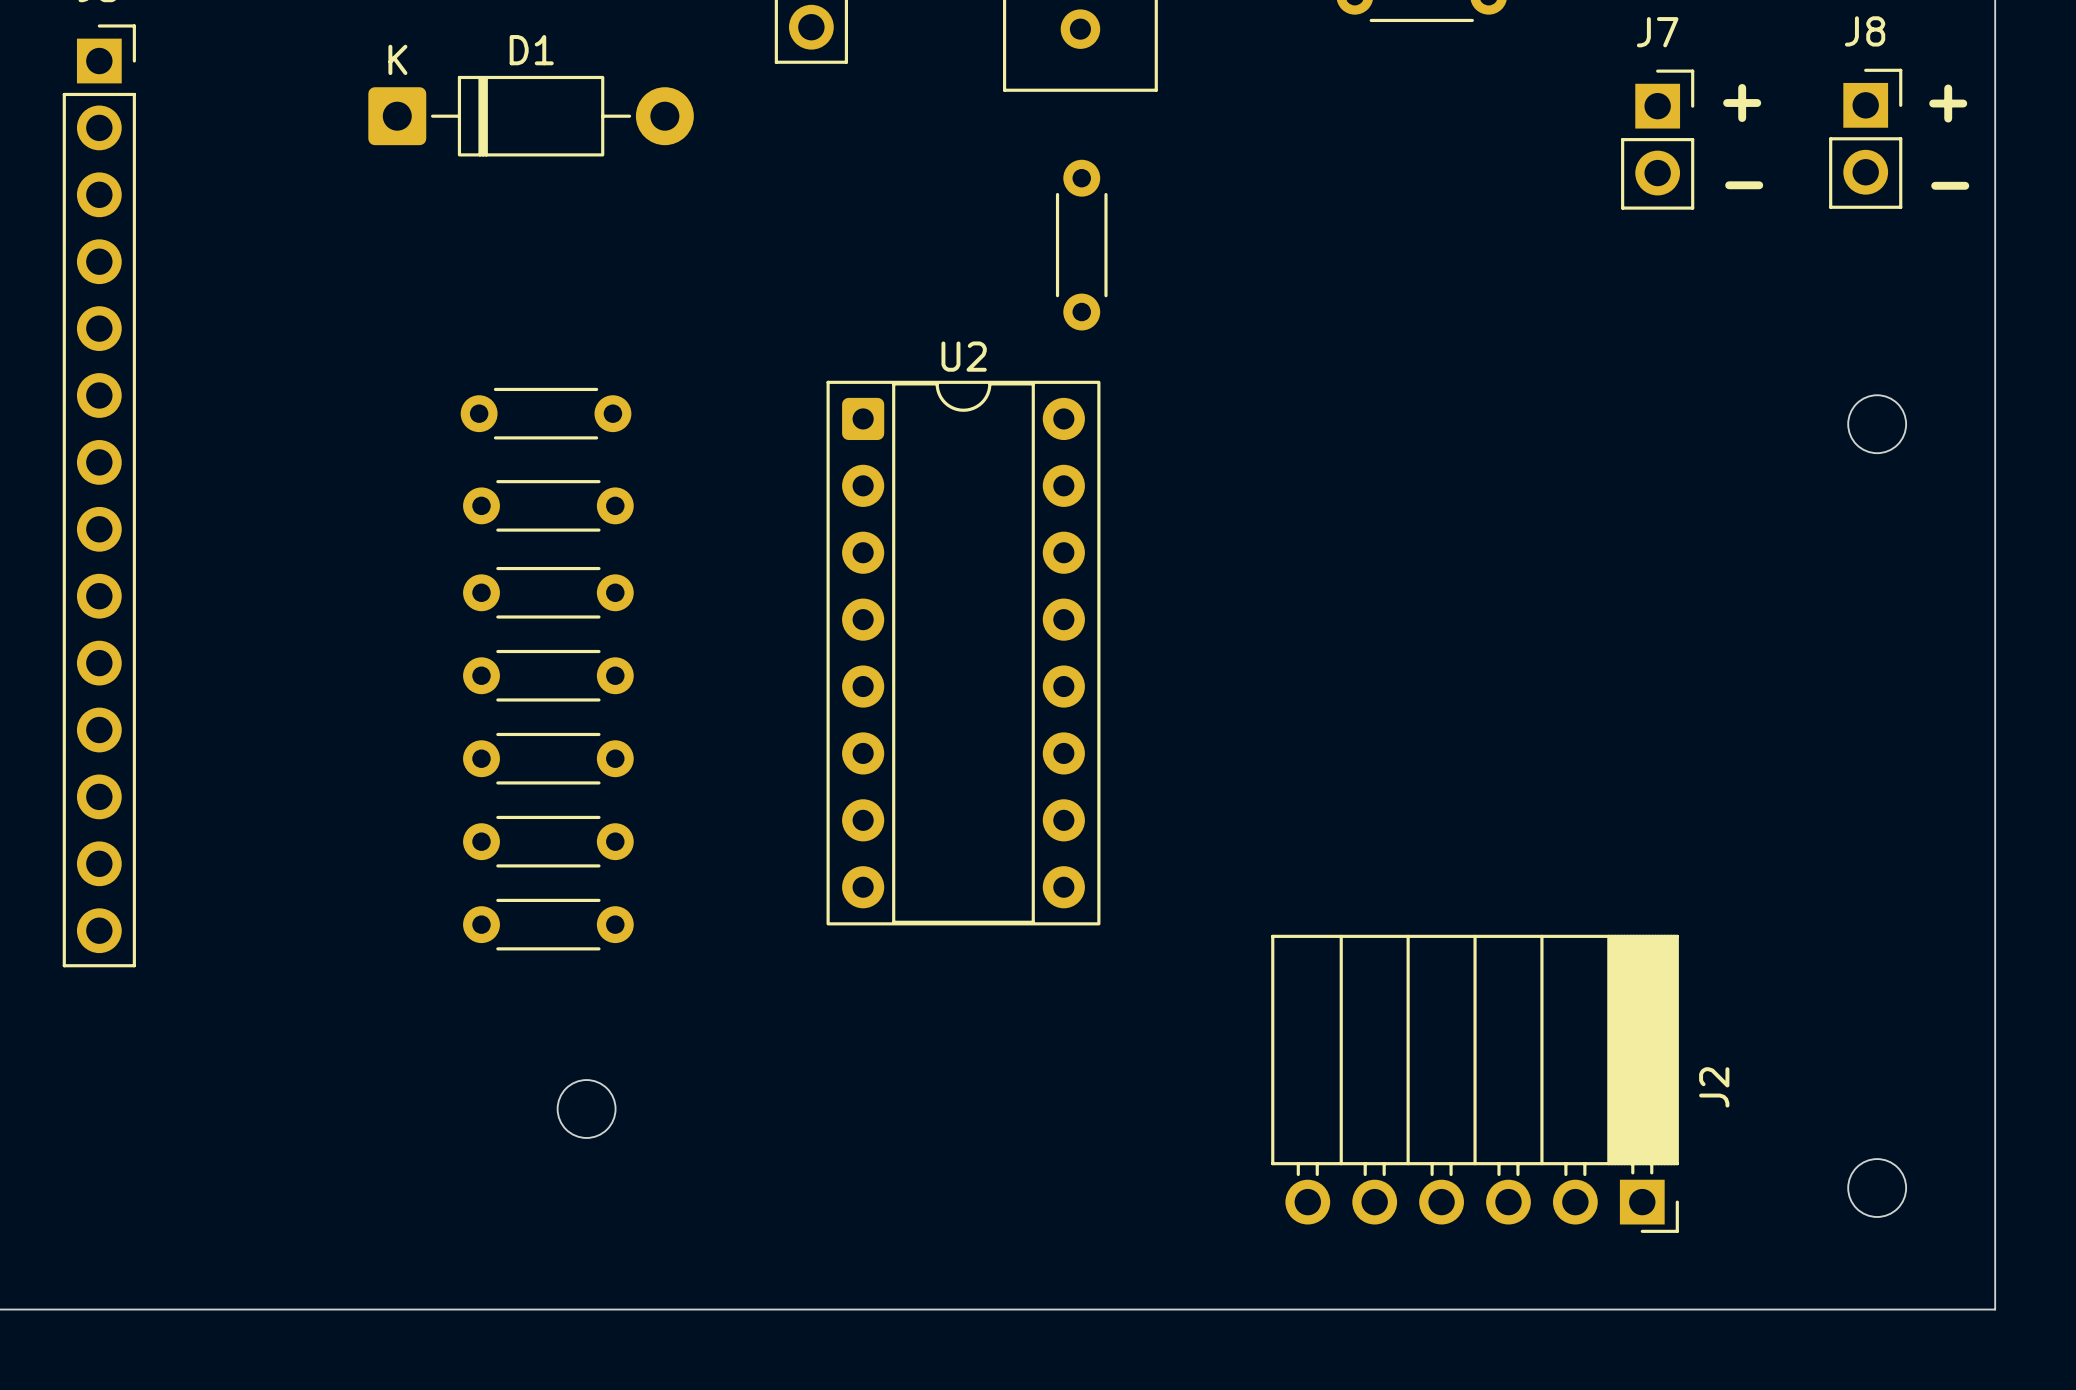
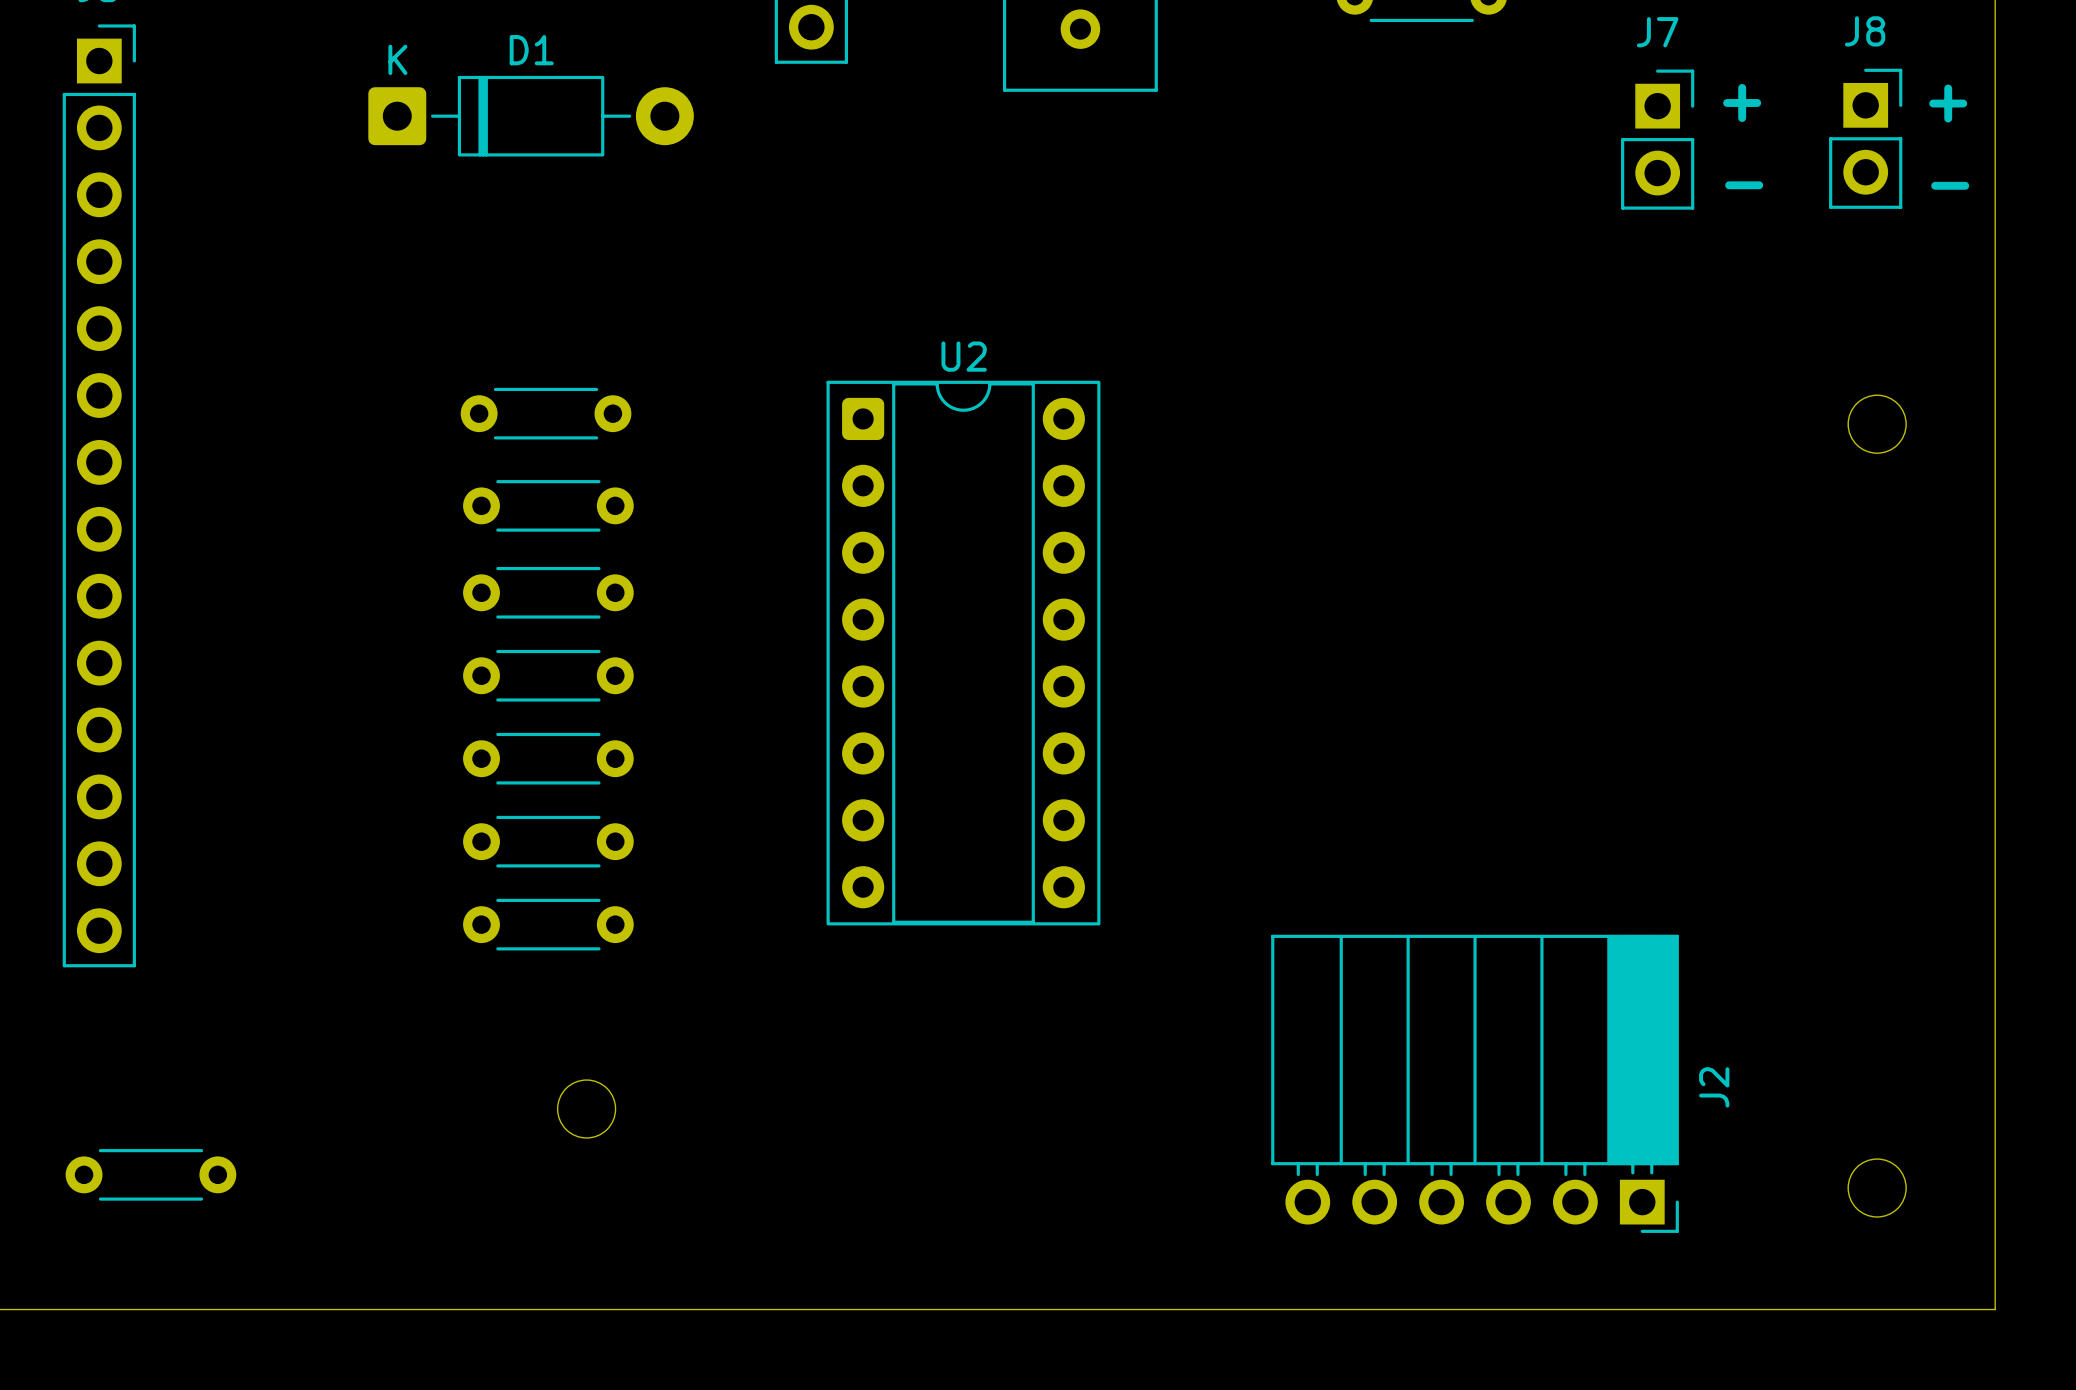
part: (1081, 245) -> none
part: none -> (150, 1174)

